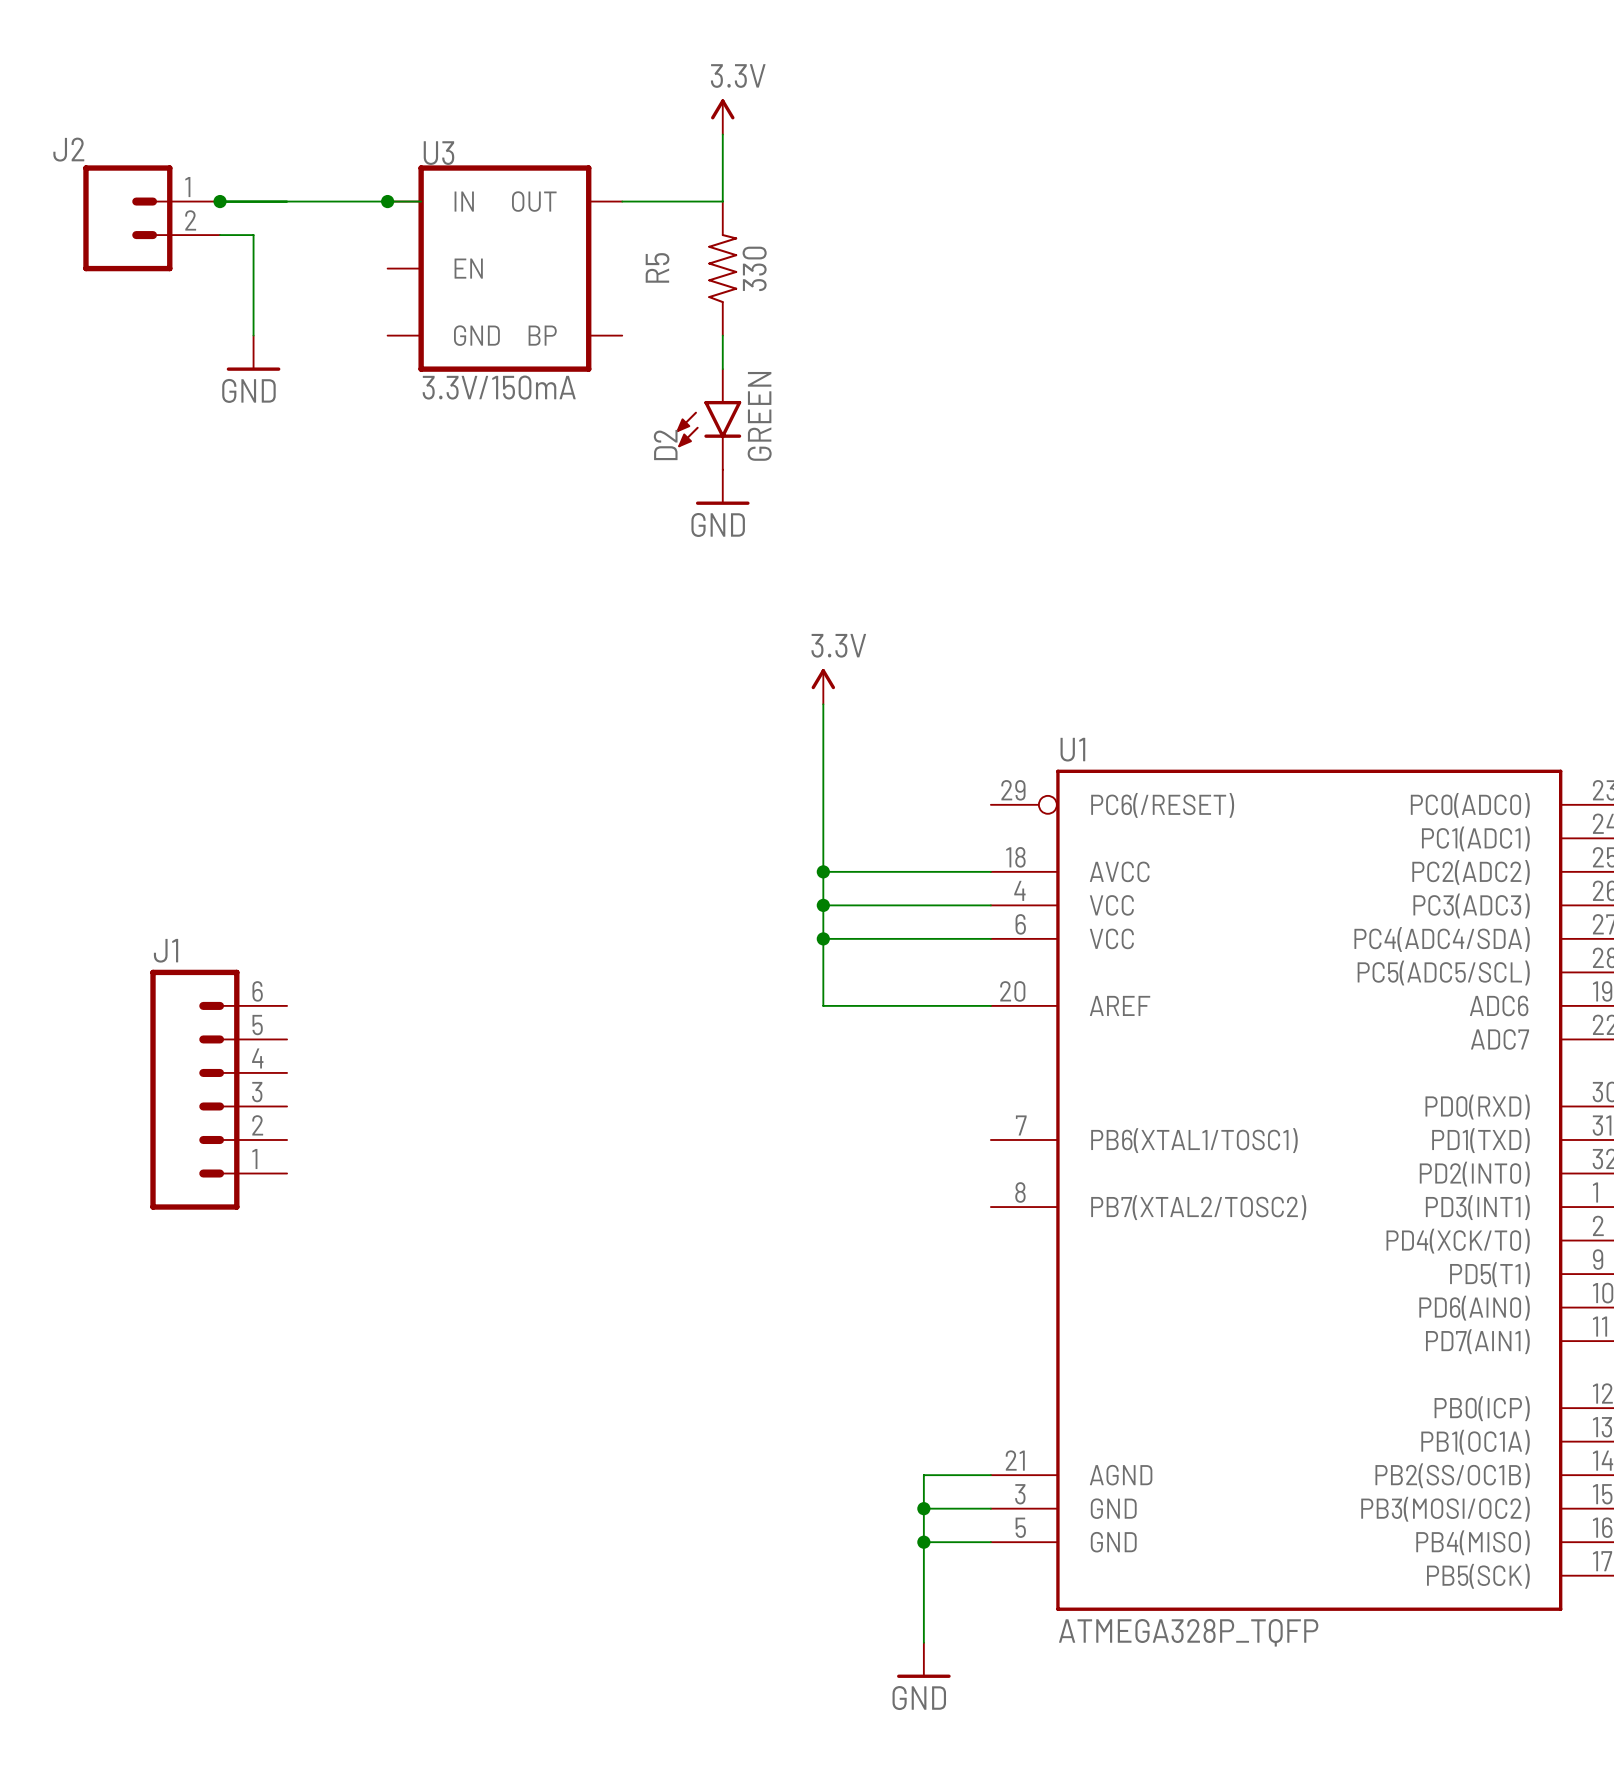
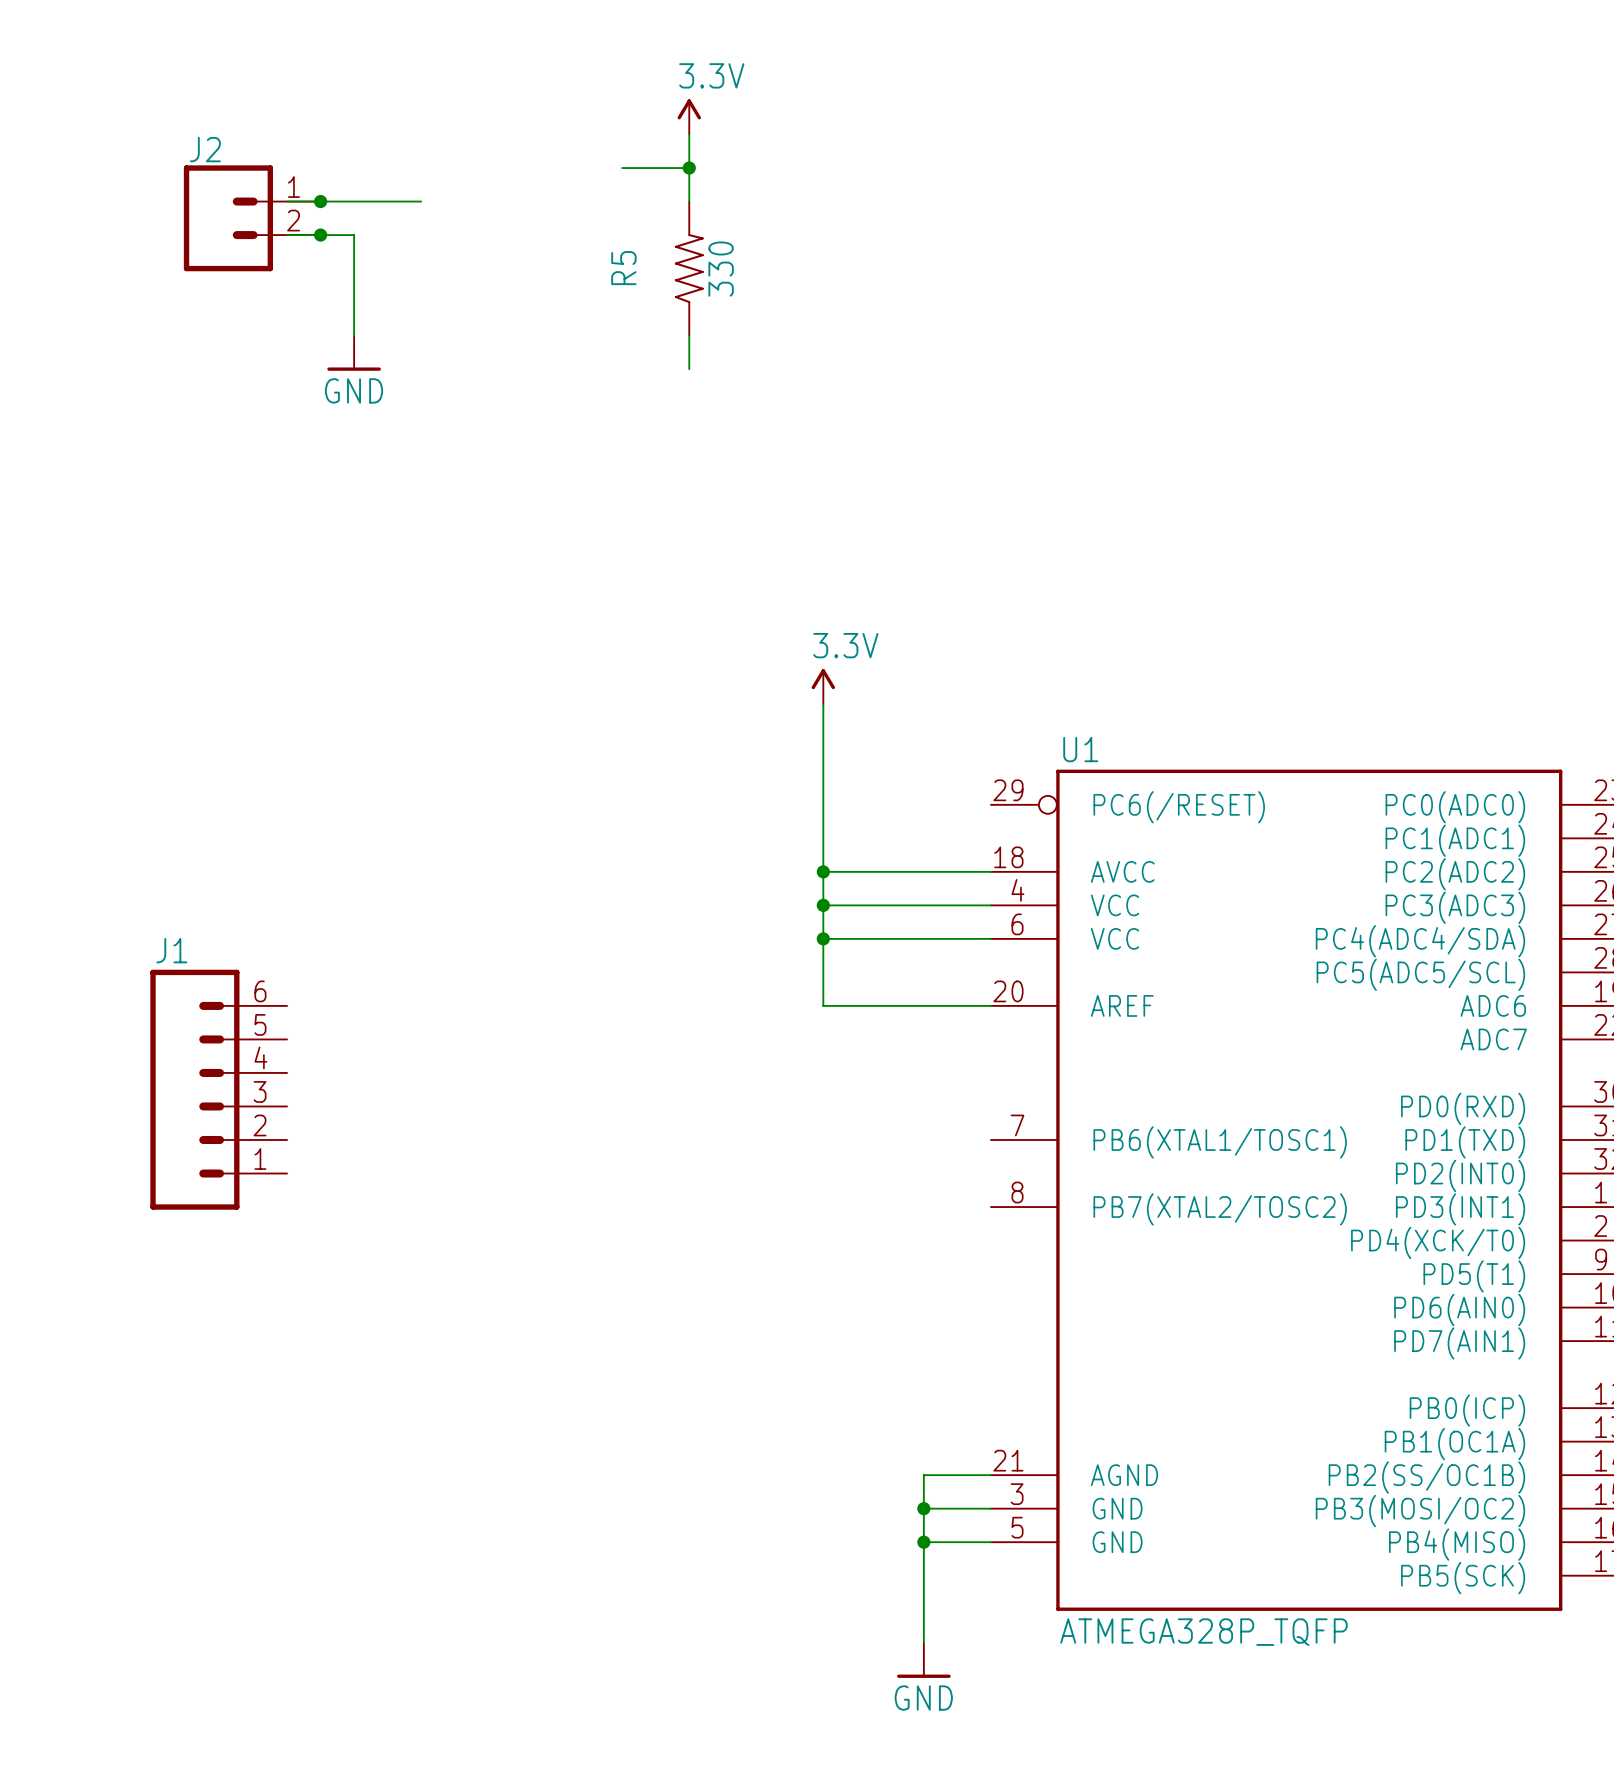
power symbol position: 3.3V (722, 116) -> 3.3V (689, 116)
wire: none -> (689, 134) (689, 201)
wire: (722, 134) (722, 201) (622, 201) -> none
J2 name position: J2 (68, 149) -> J2 (205, 149)
wire: none -> (622, 168) (689, 168)
junction: none -> (689, 168)
junction: (220, 201) -> none
junction: none -> (320, 201)
junction: (387, 201) -> none
J2 position: (151, 218) -> (252, 218)
wire: (220, 235) (253, 235) (253, 335) -> none
wire: none -> (287, 235) (354, 235) (354, 335)
junction: none -> (320, 235)
U3: 3.3V/150mA (504, 268) -> none
R5 position: (722, 268) -> (689, 268)
wire: (722, 335) (722, 369) -> (689, 335) (689, 369)
power symbol position: GND (253, 353) -> GND (354, 353)
D2: GREEN (708, 419) -> none
power symbol: GND (722, 487) -> none

